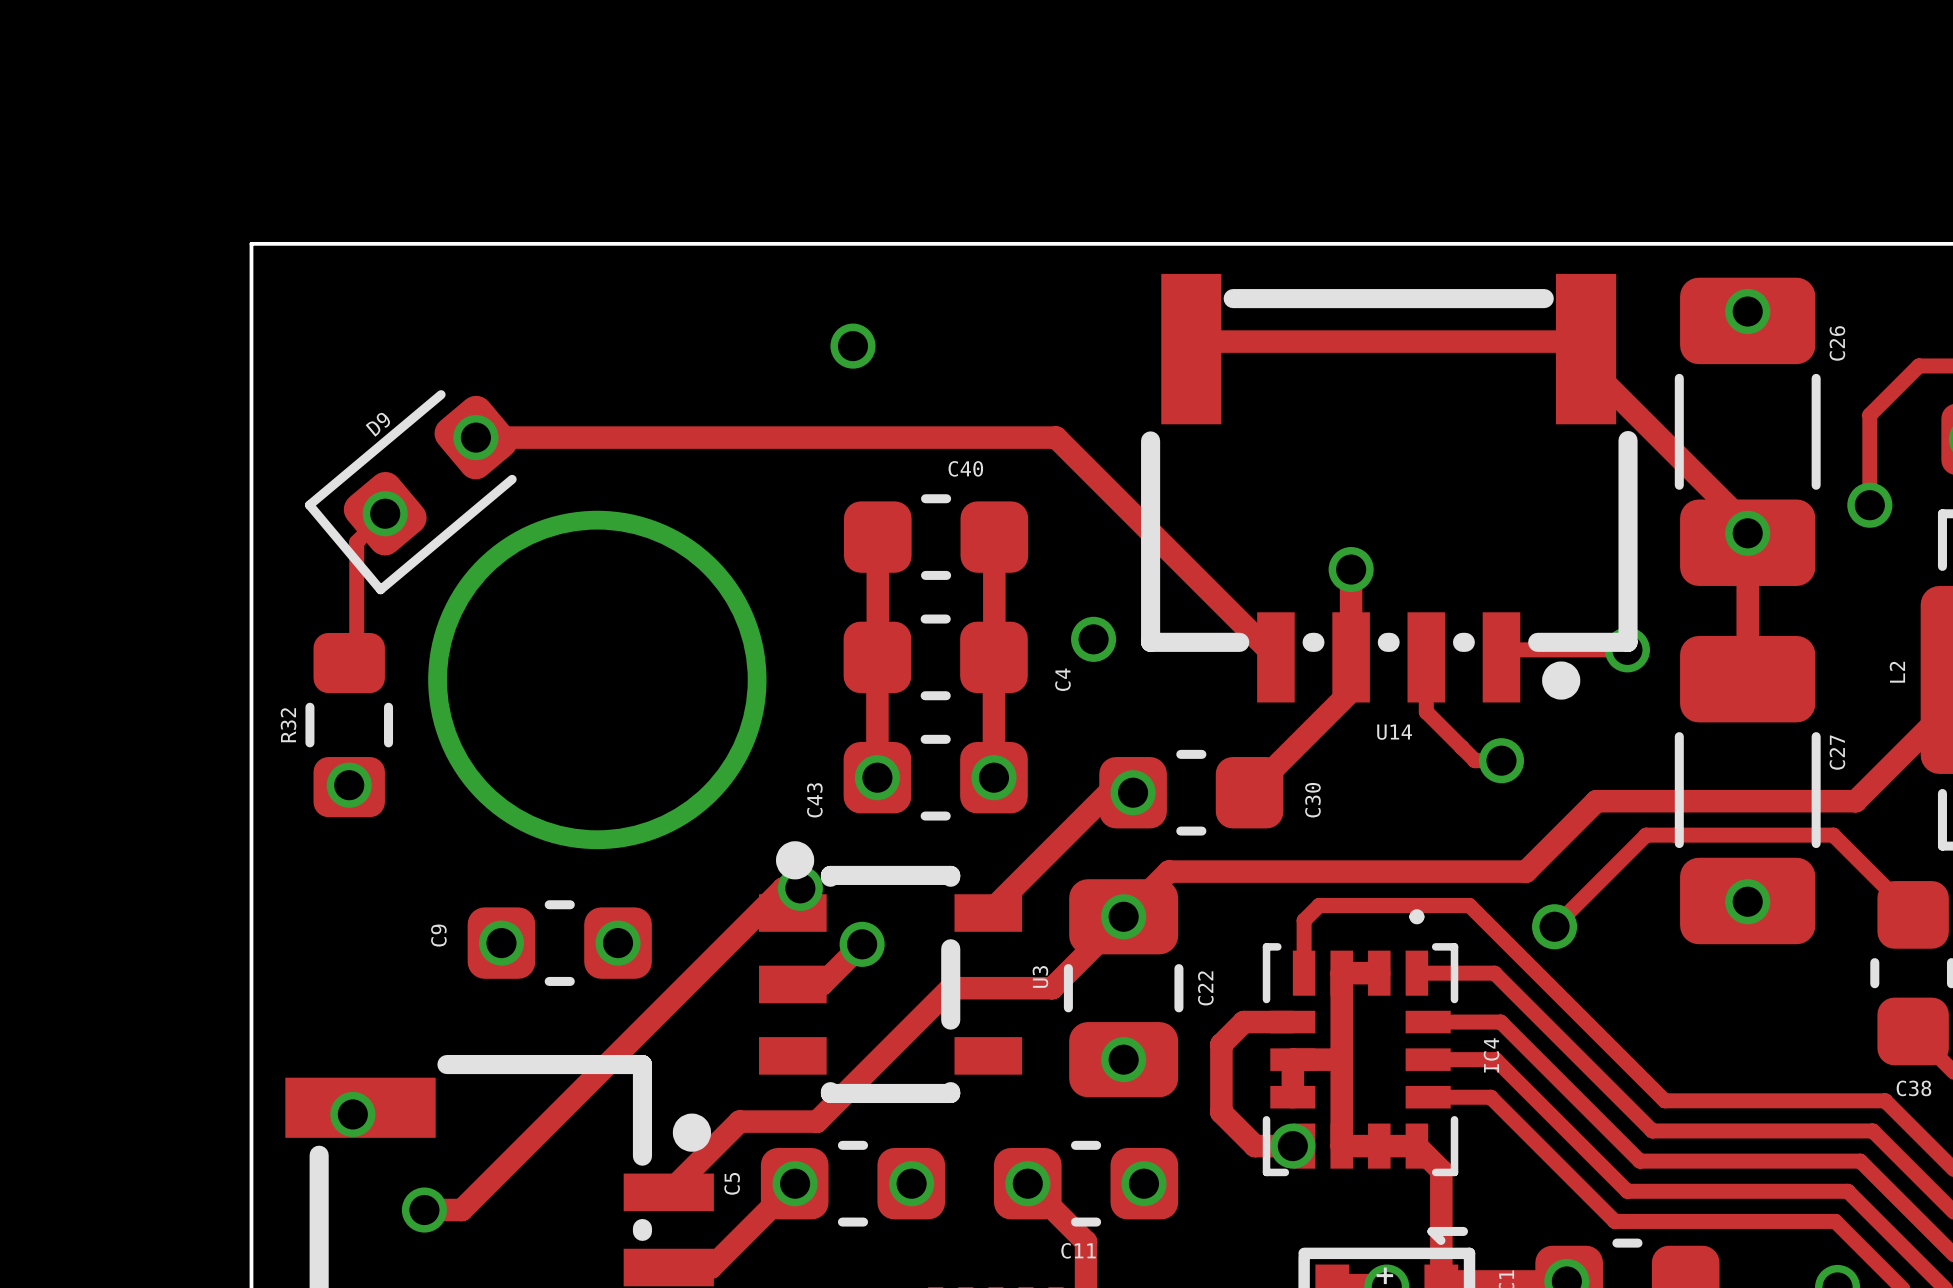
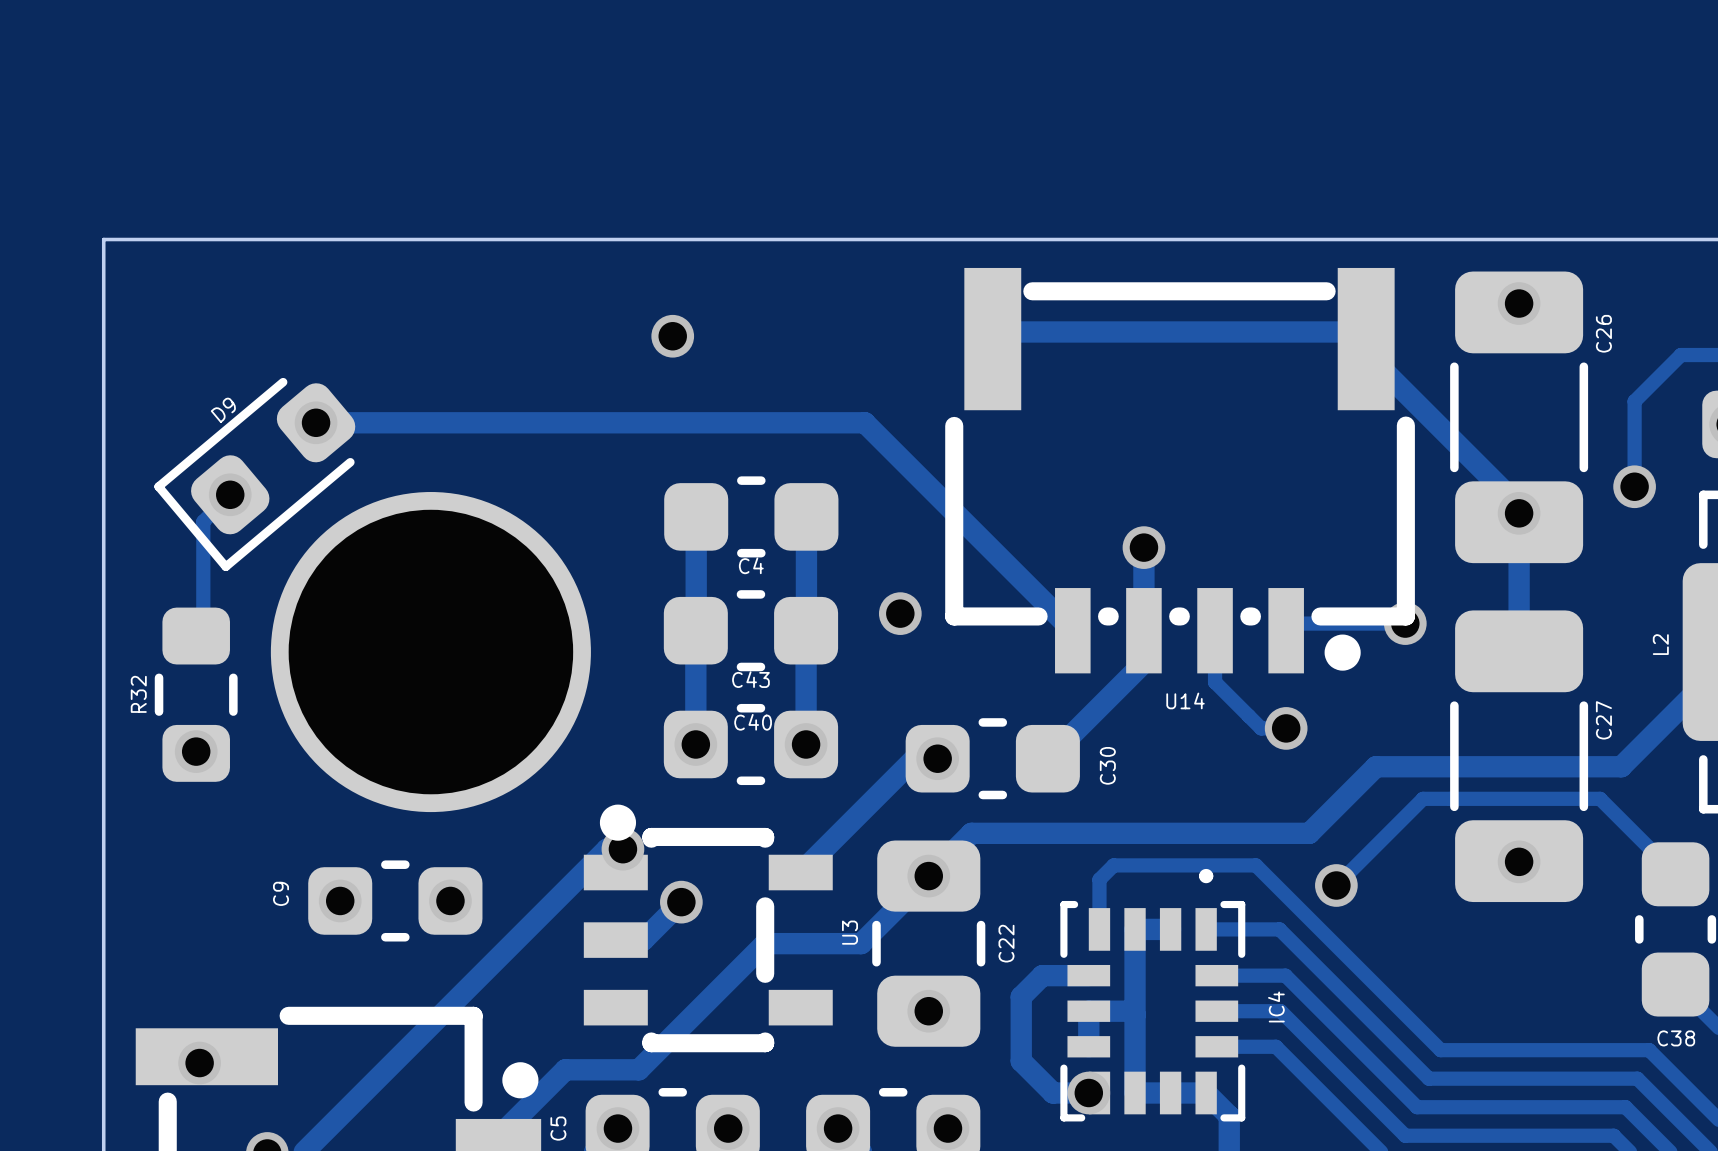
C40 name position: C40 (965, 468) -> C40 (753, 722)
C4 name rotation: 0° (1062, 679) -> 90° clockwise (751, 565)
C4 name position: C4 (1062, 679) -> C4 (751, 565)
C43 name rotation: 0° (814, 800) -> 90° clockwise (750, 679)
C43 name position: C43 (814, 800) -> C43 (750, 679)

